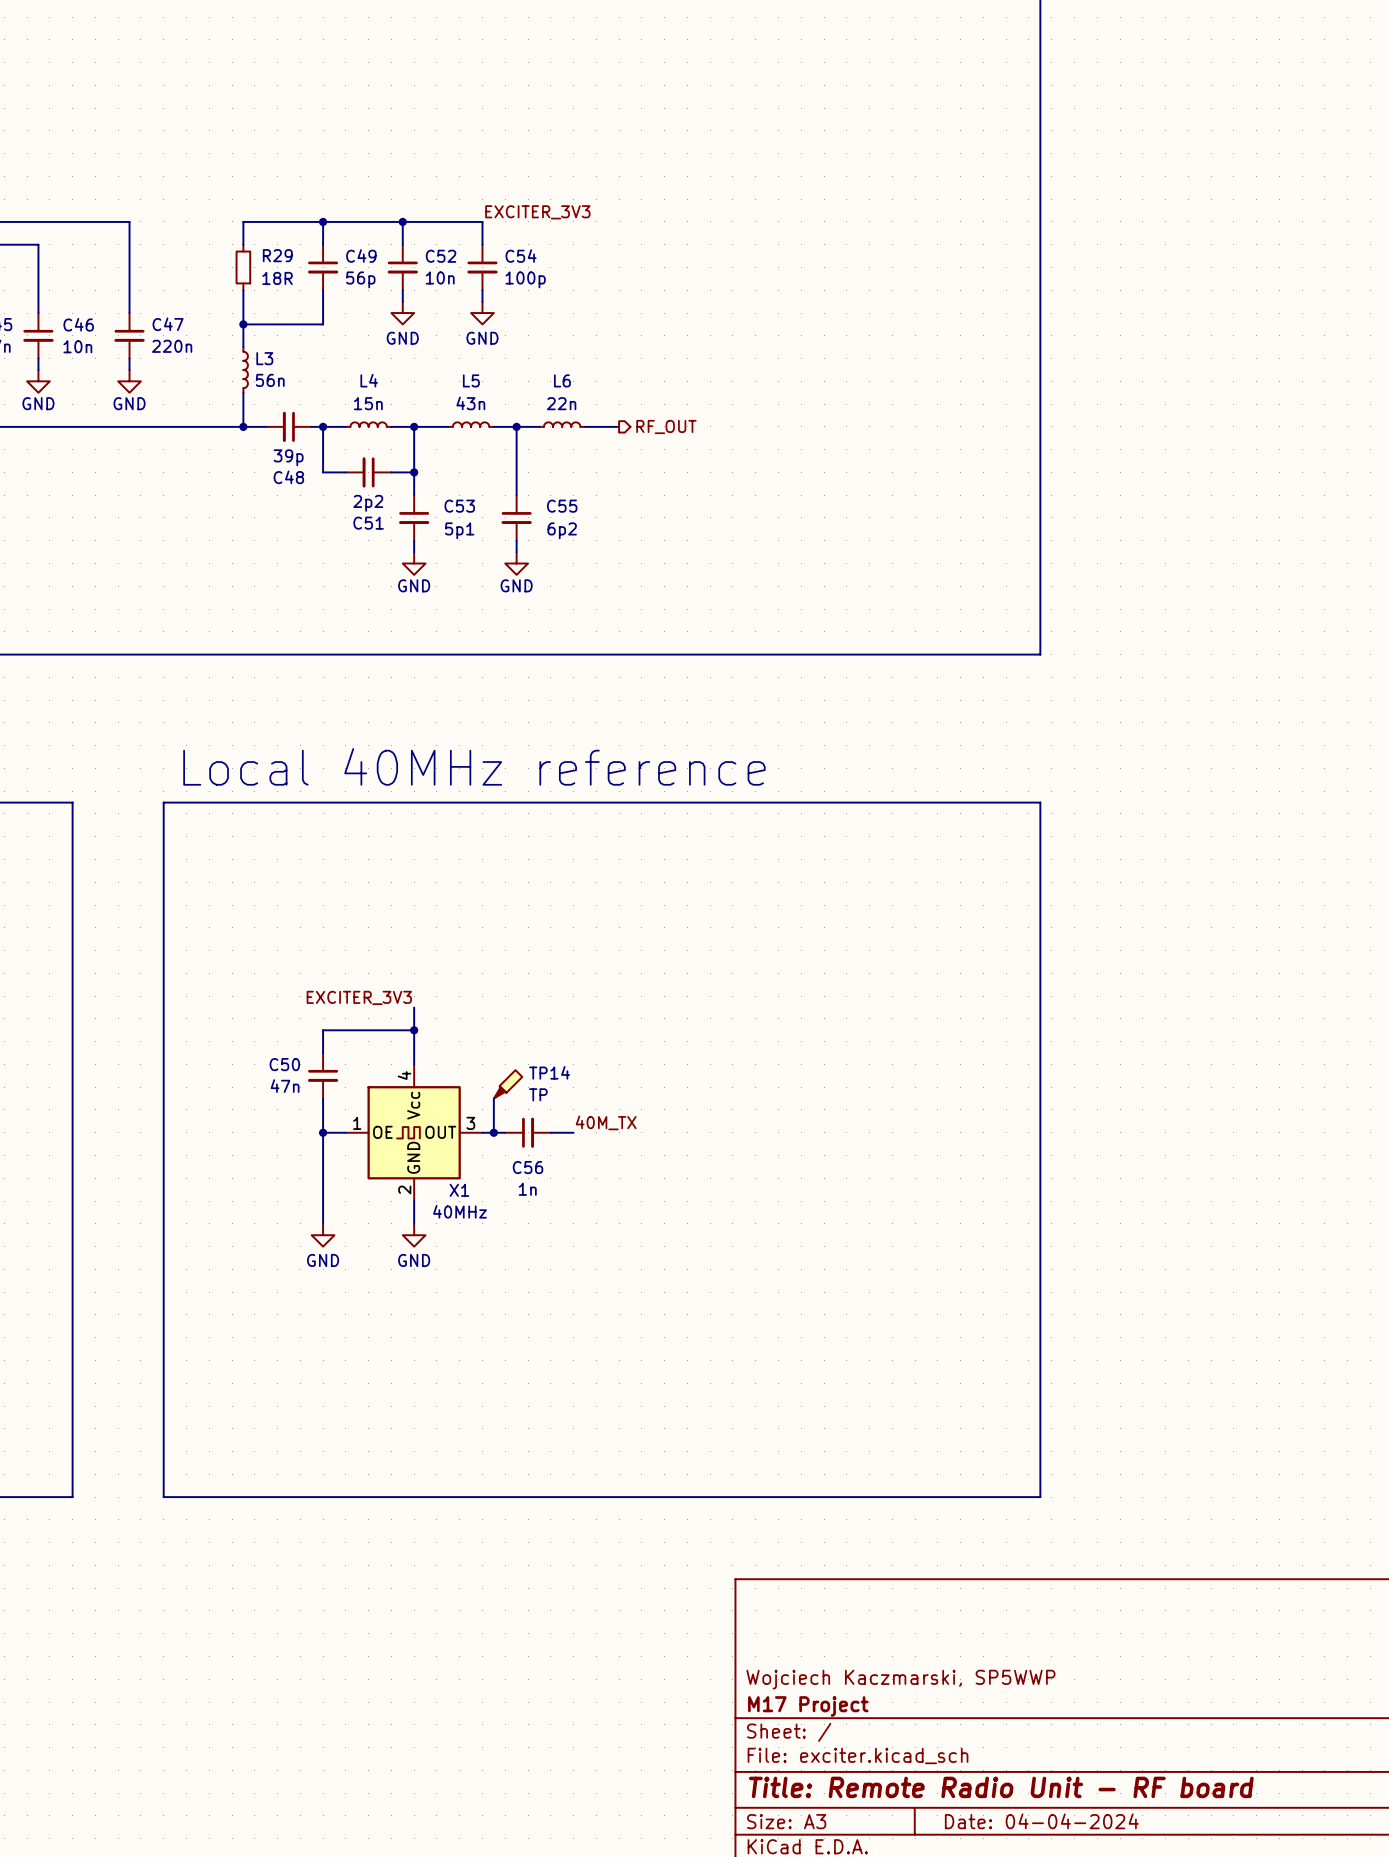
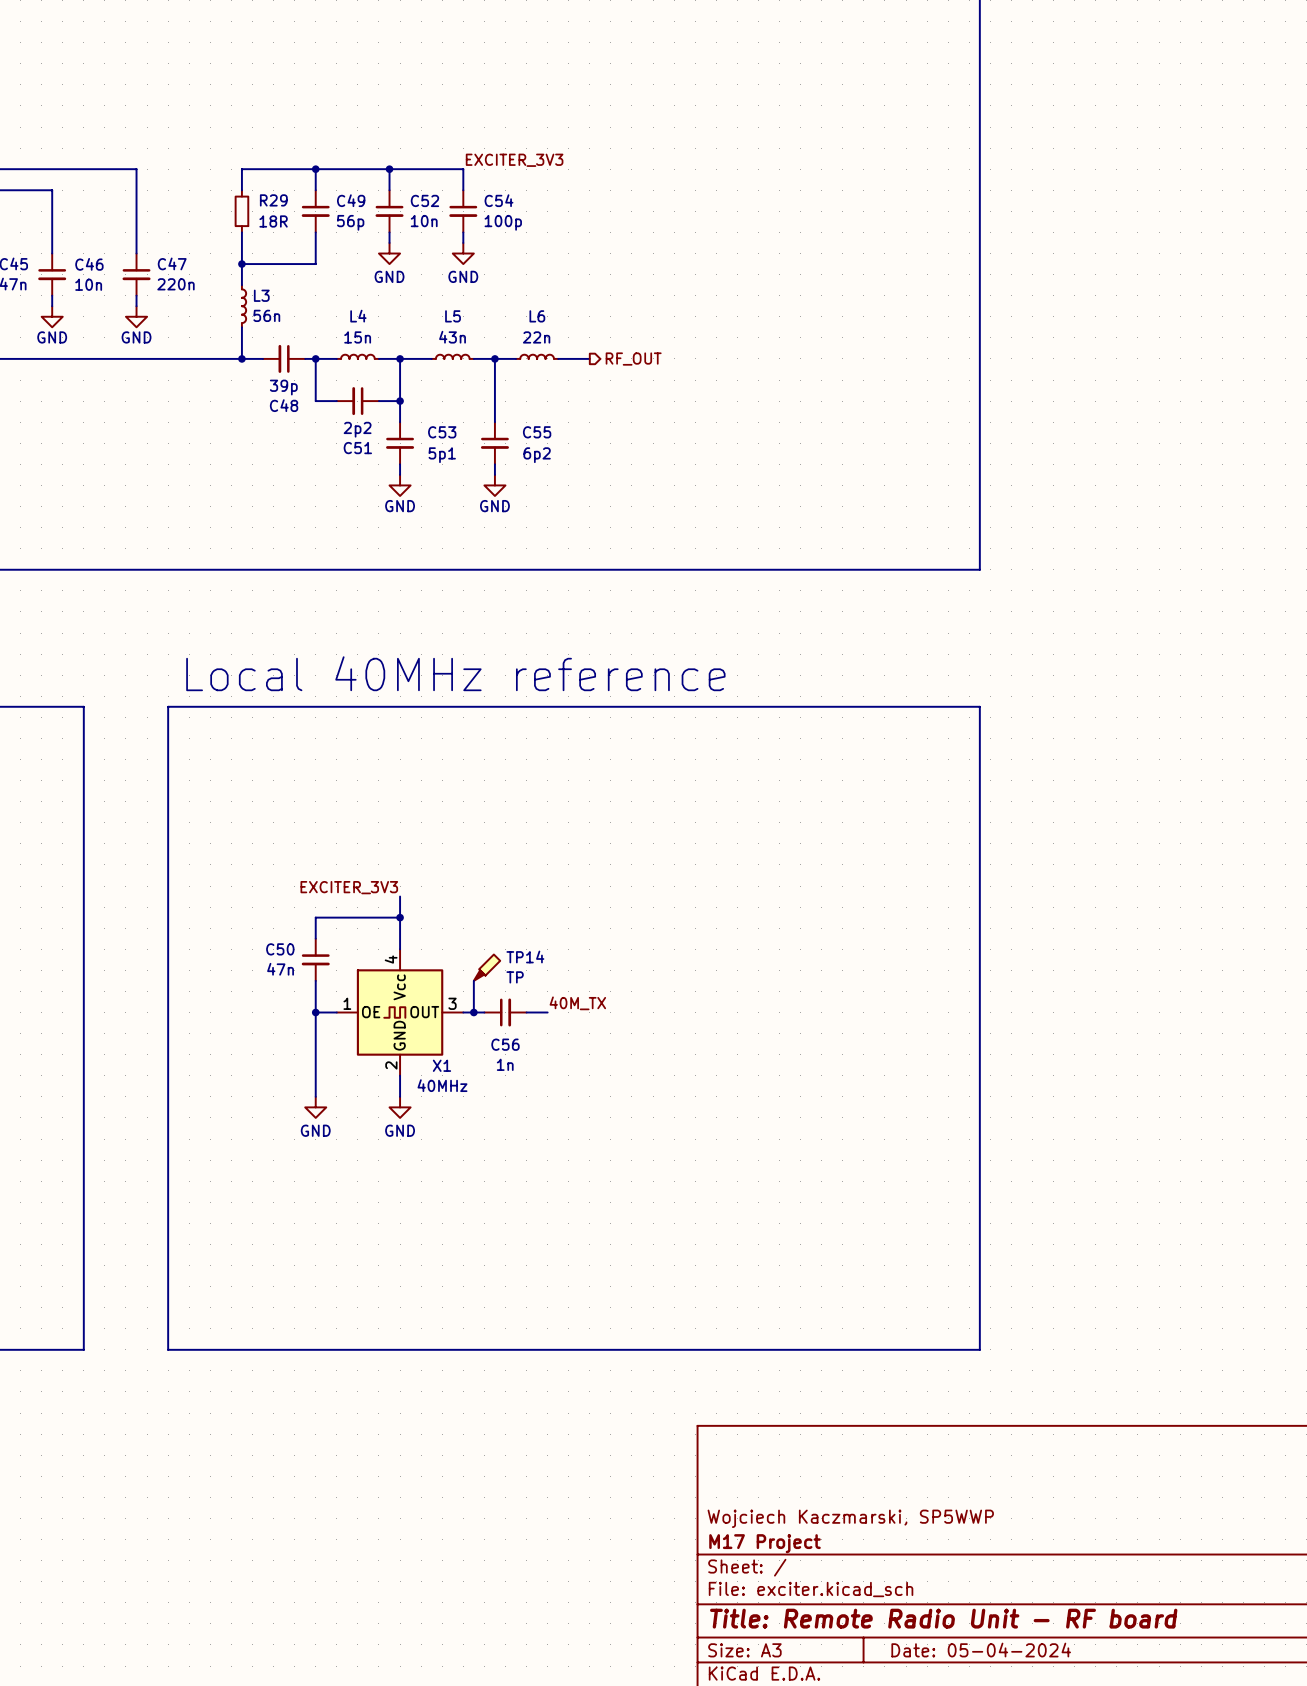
title block: Date: 04-04-2024 (1041, 1821) -> Date: 05-04-2024 (981, 1650)

